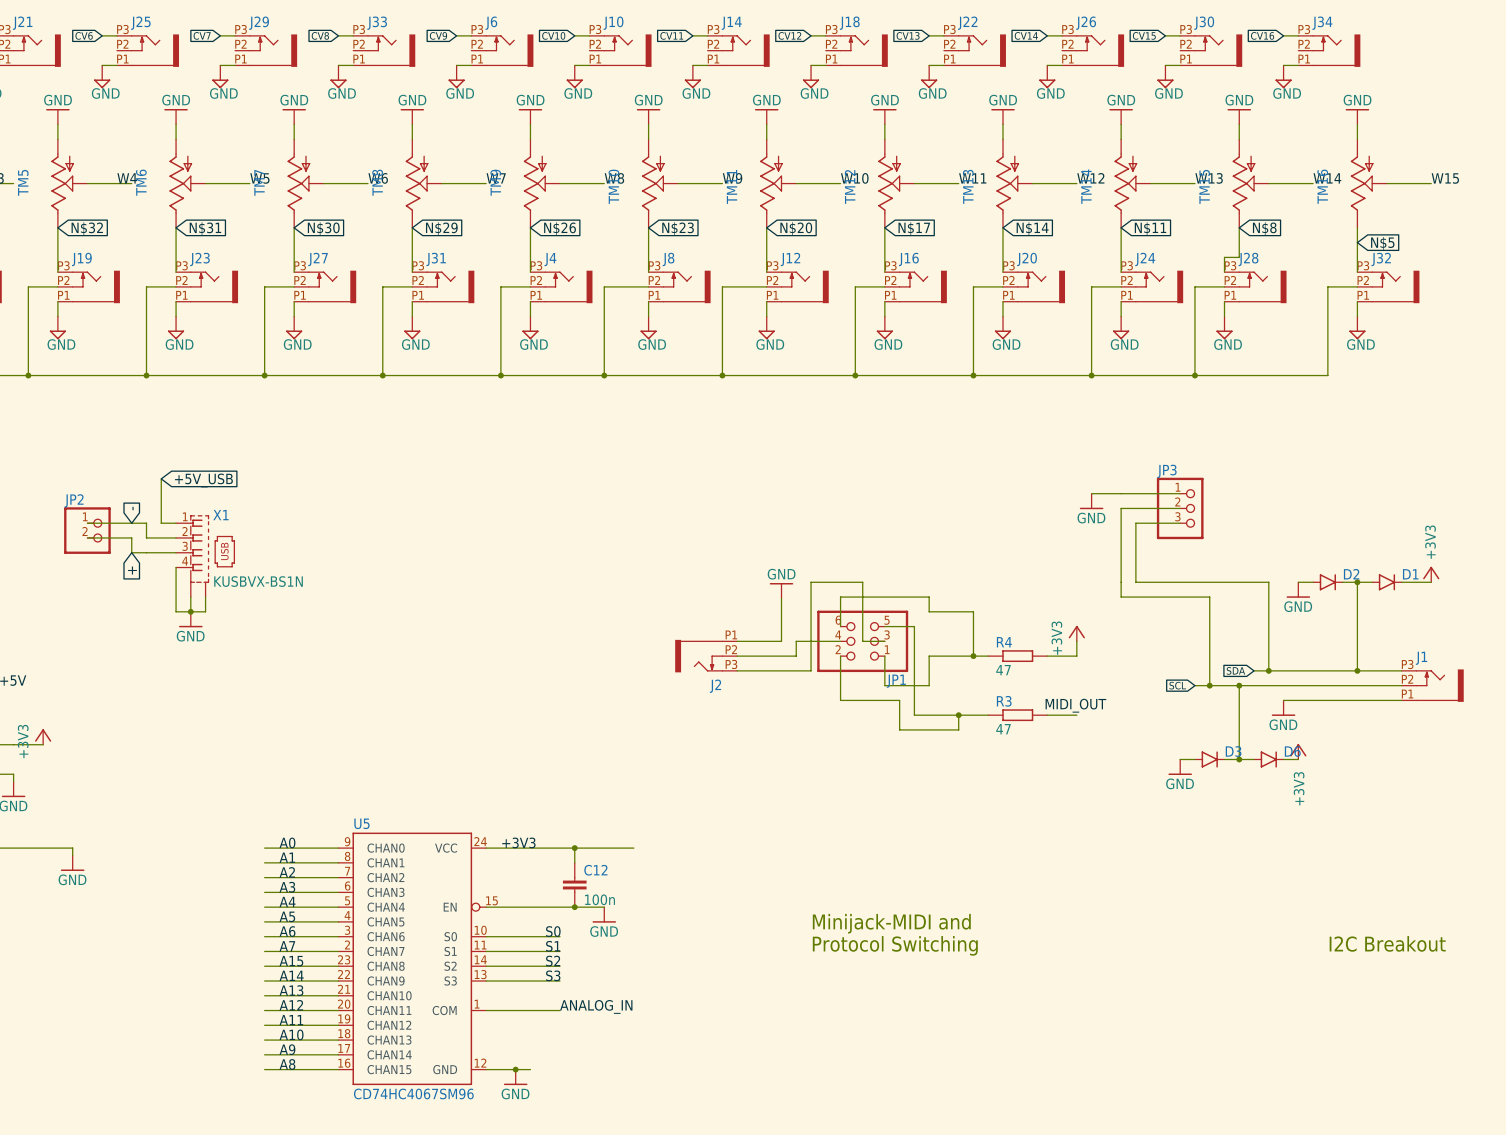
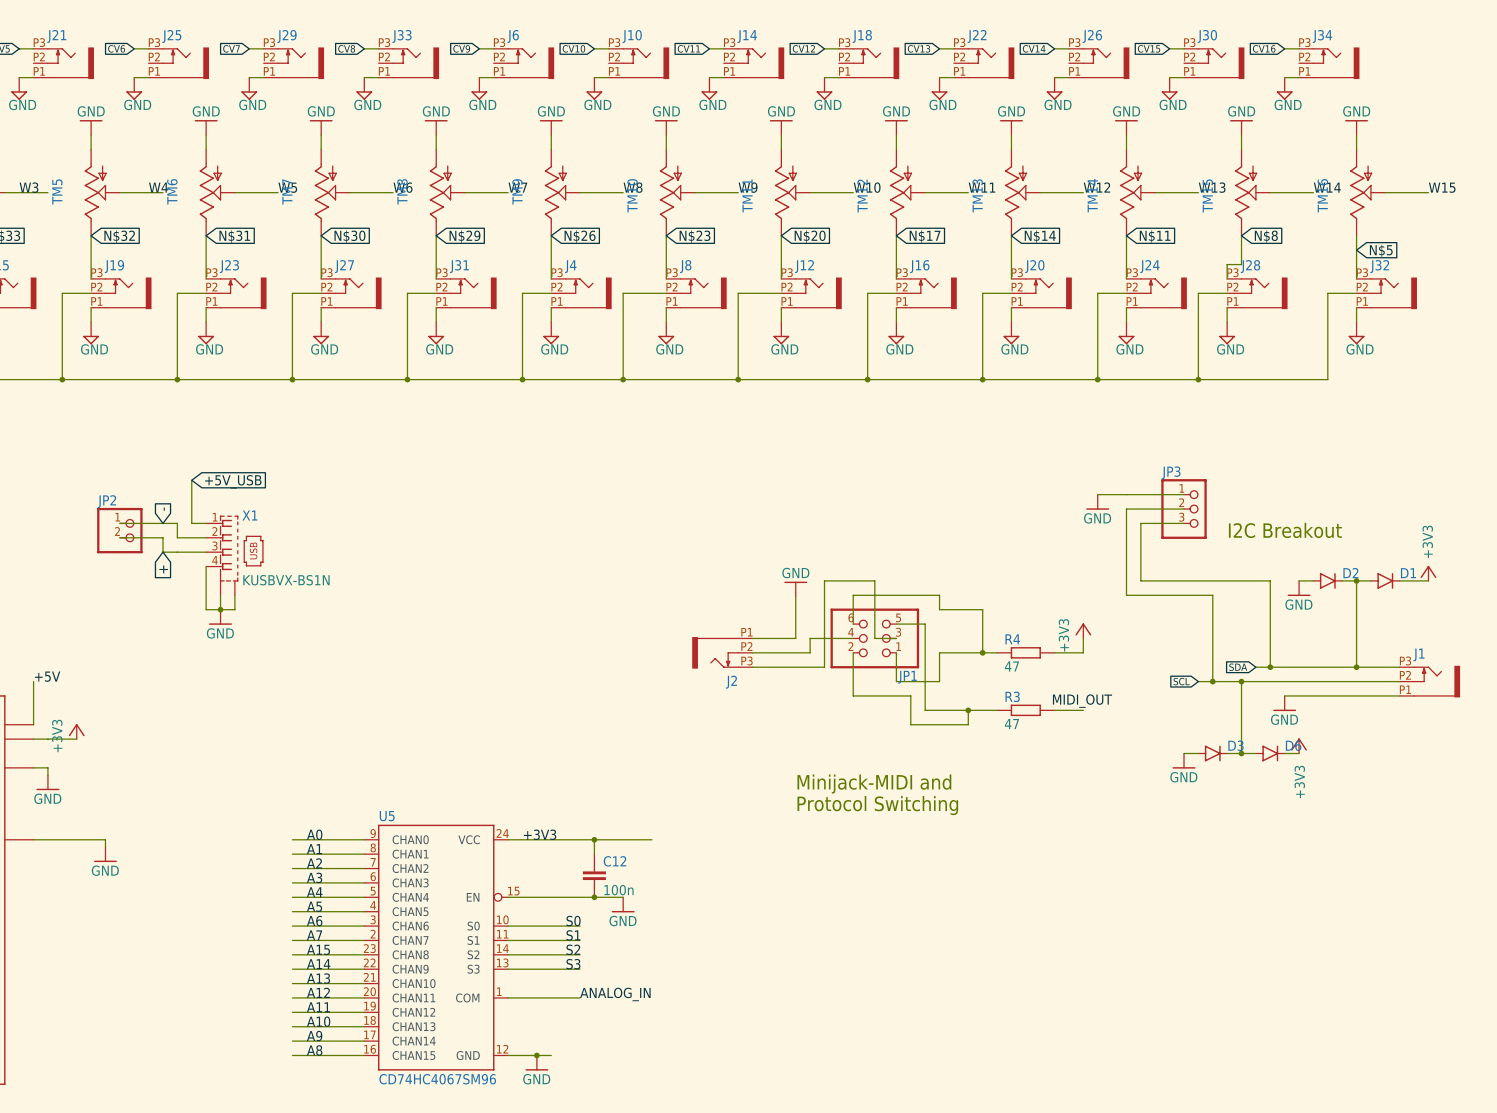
text: none -> I2C Breakout (1285, 530)
text position: Minijack-MIDI and (891, 923) -> Minijack-MIDI and (874, 784)
text: I2C Breakout (1387, 943) -> none
text position: Protocol Switching (895, 945) -> Protocol Switching (877, 805)

